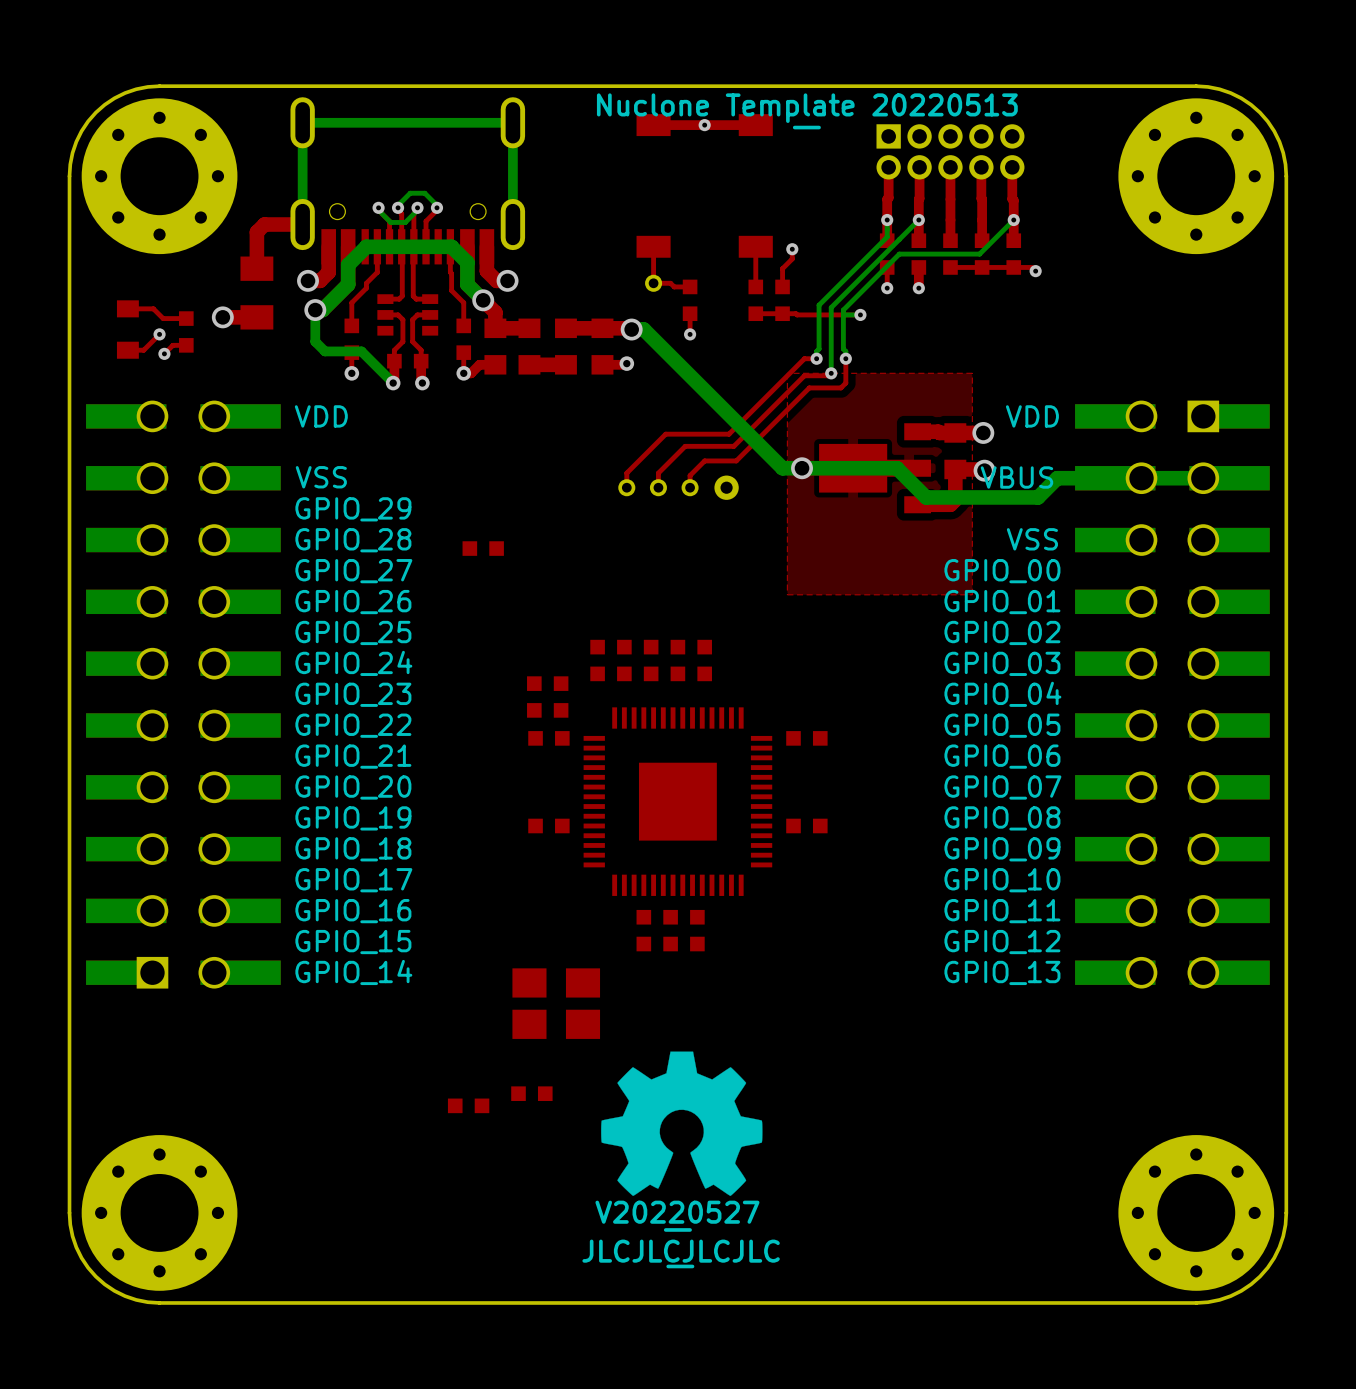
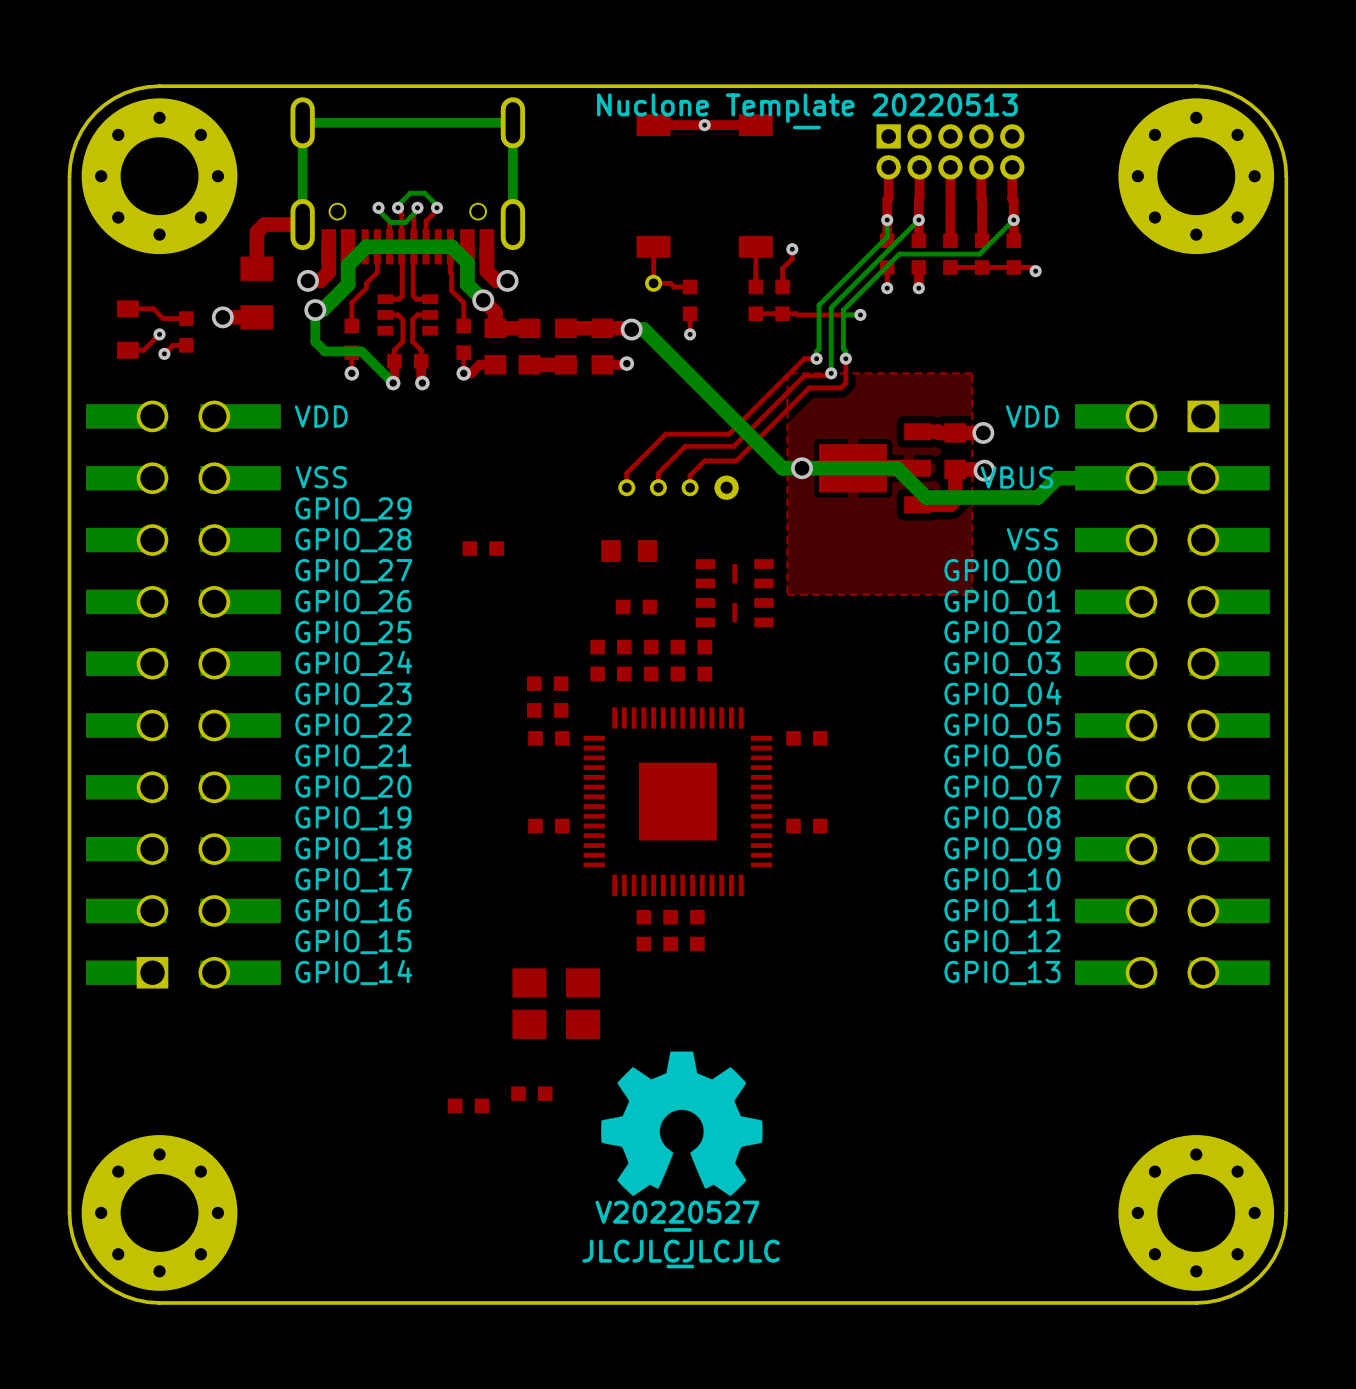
part: none -> (629, 550)
part: none -> (734, 593)
part: none -> (636, 606)

